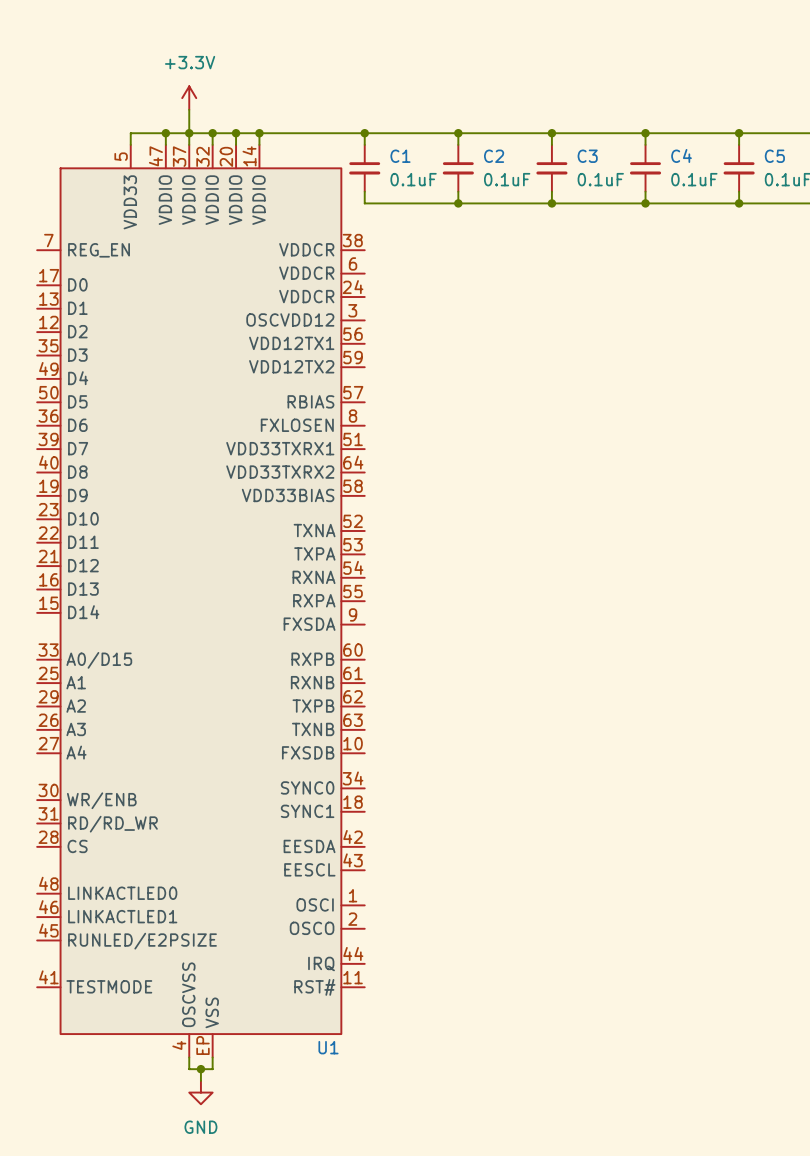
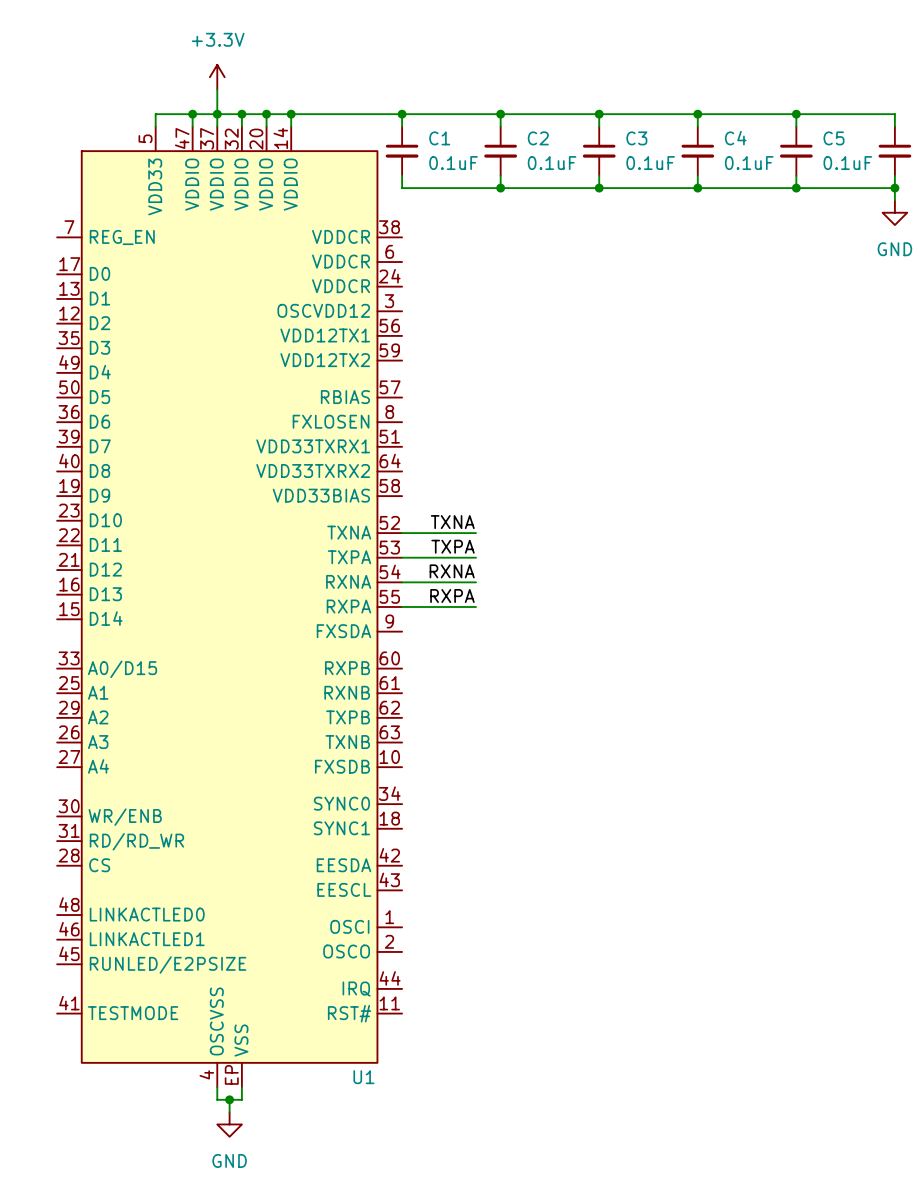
label: none -> TXNA (452, 522)
wire: none -> (402, 533) (476, 533)
label: none -> TXPA (453, 546)
wire: none -> (402, 557) (476, 557)
label: none -> RXNA (452, 571)
wire: none -> (402, 582) (476, 582)
label: none -> RXPA (452, 596)
wire: none -> (402, 606) (476, 606)

